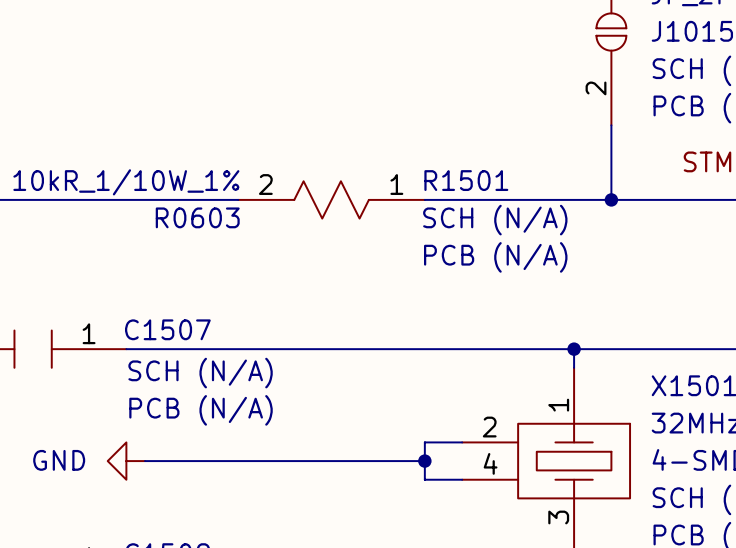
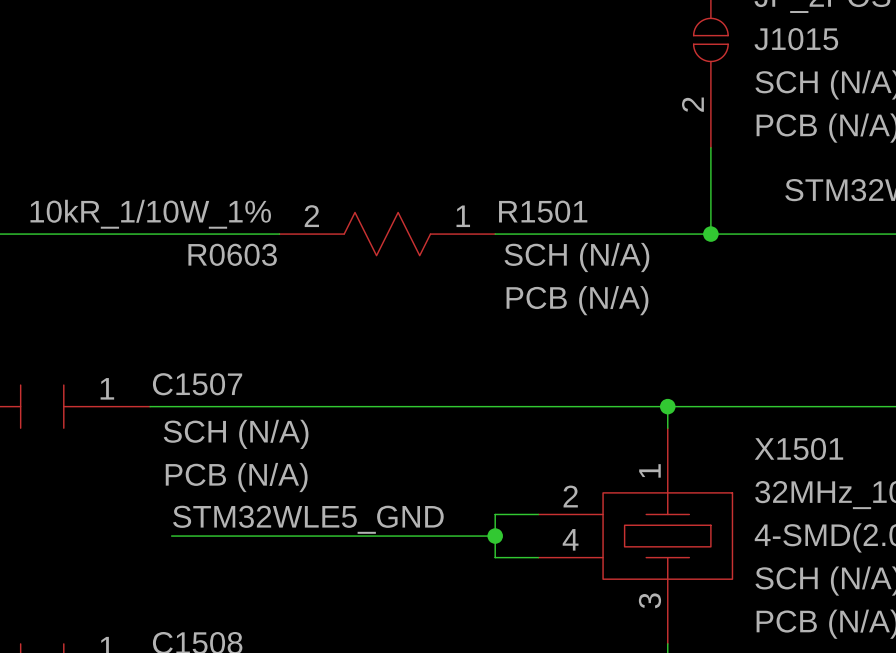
label: none -> STM32WLE5_GND (308, 519)
power symbol: GND (126, 461) -> none

